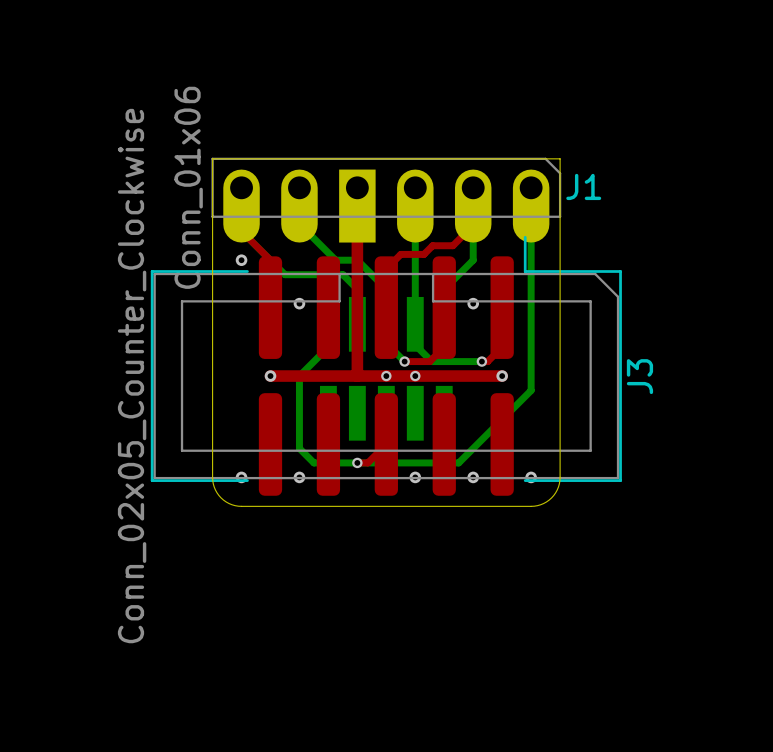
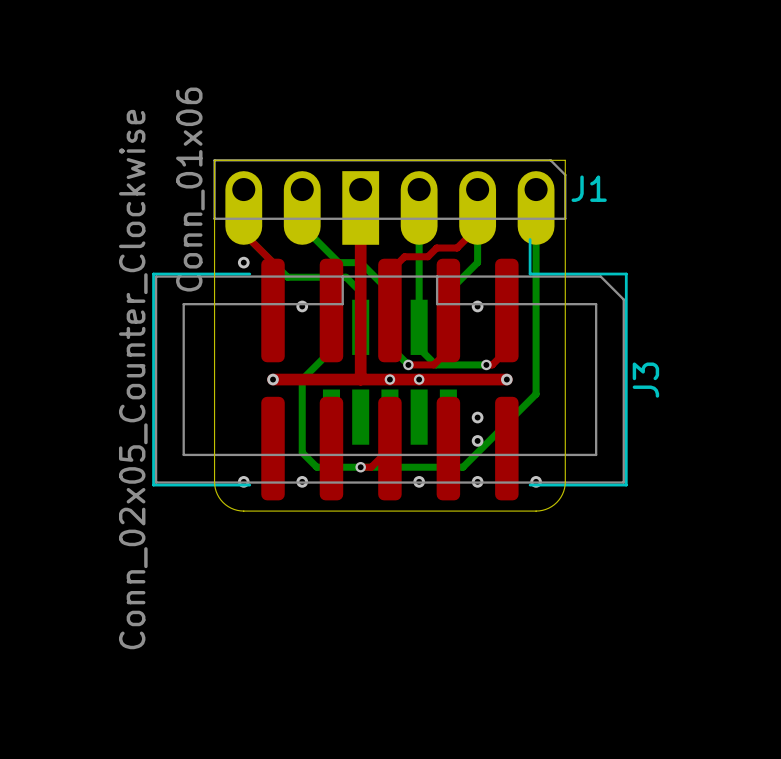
via: none -> (477, 417)
via: none -> (477, 440)

